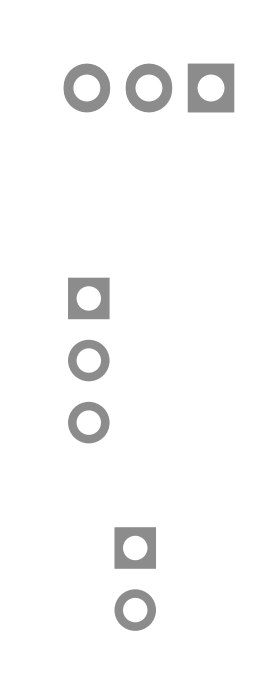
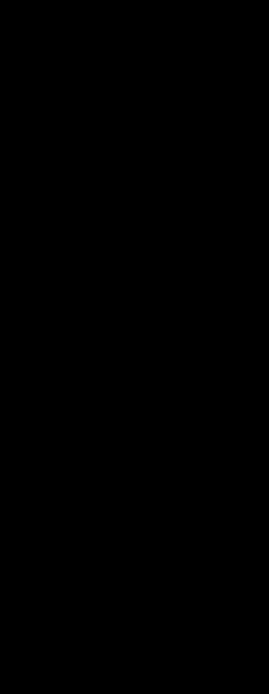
part: (148, 88) -> none
part: (88, 360) -> none
part: (135, 579) -> none

